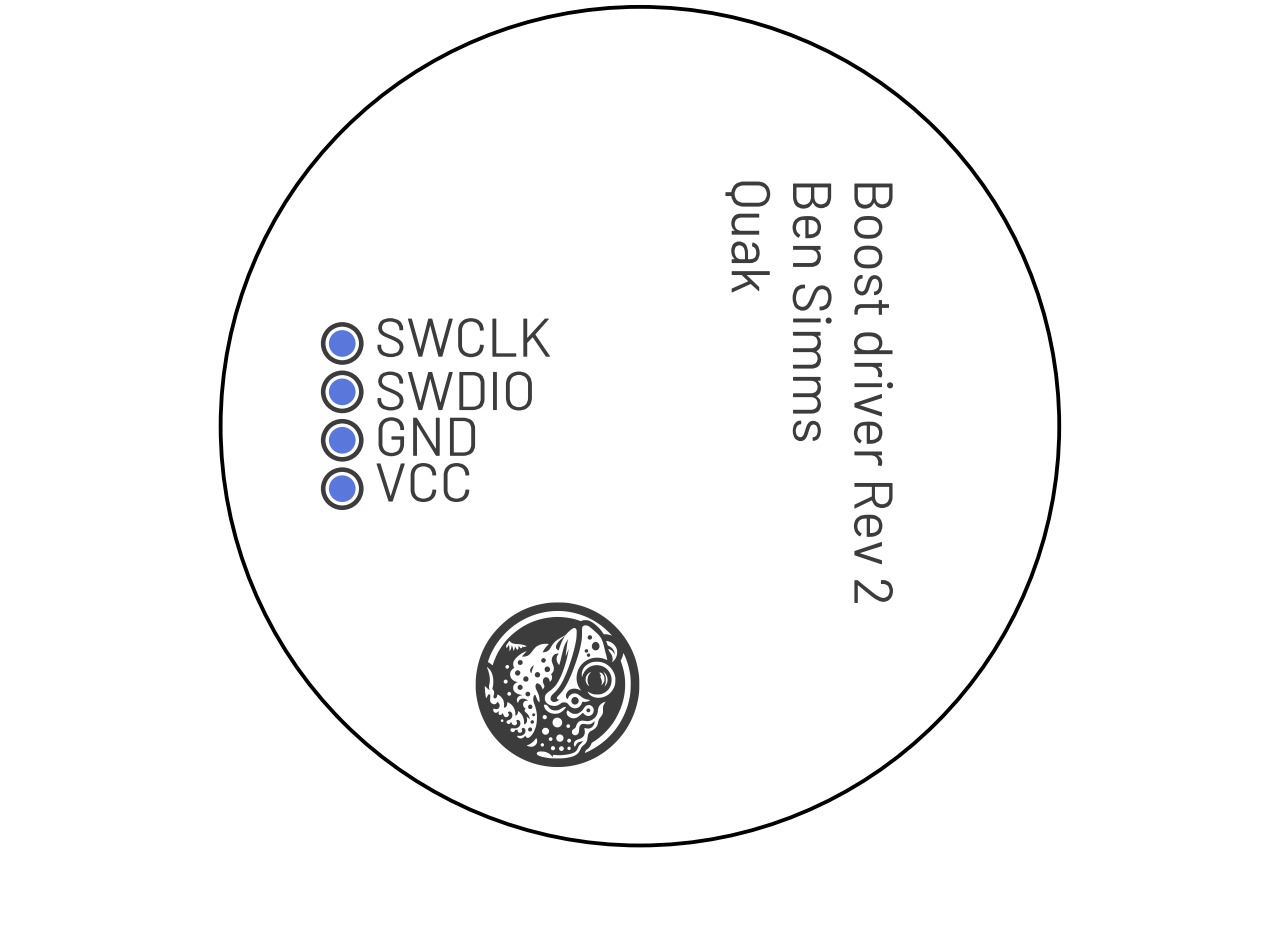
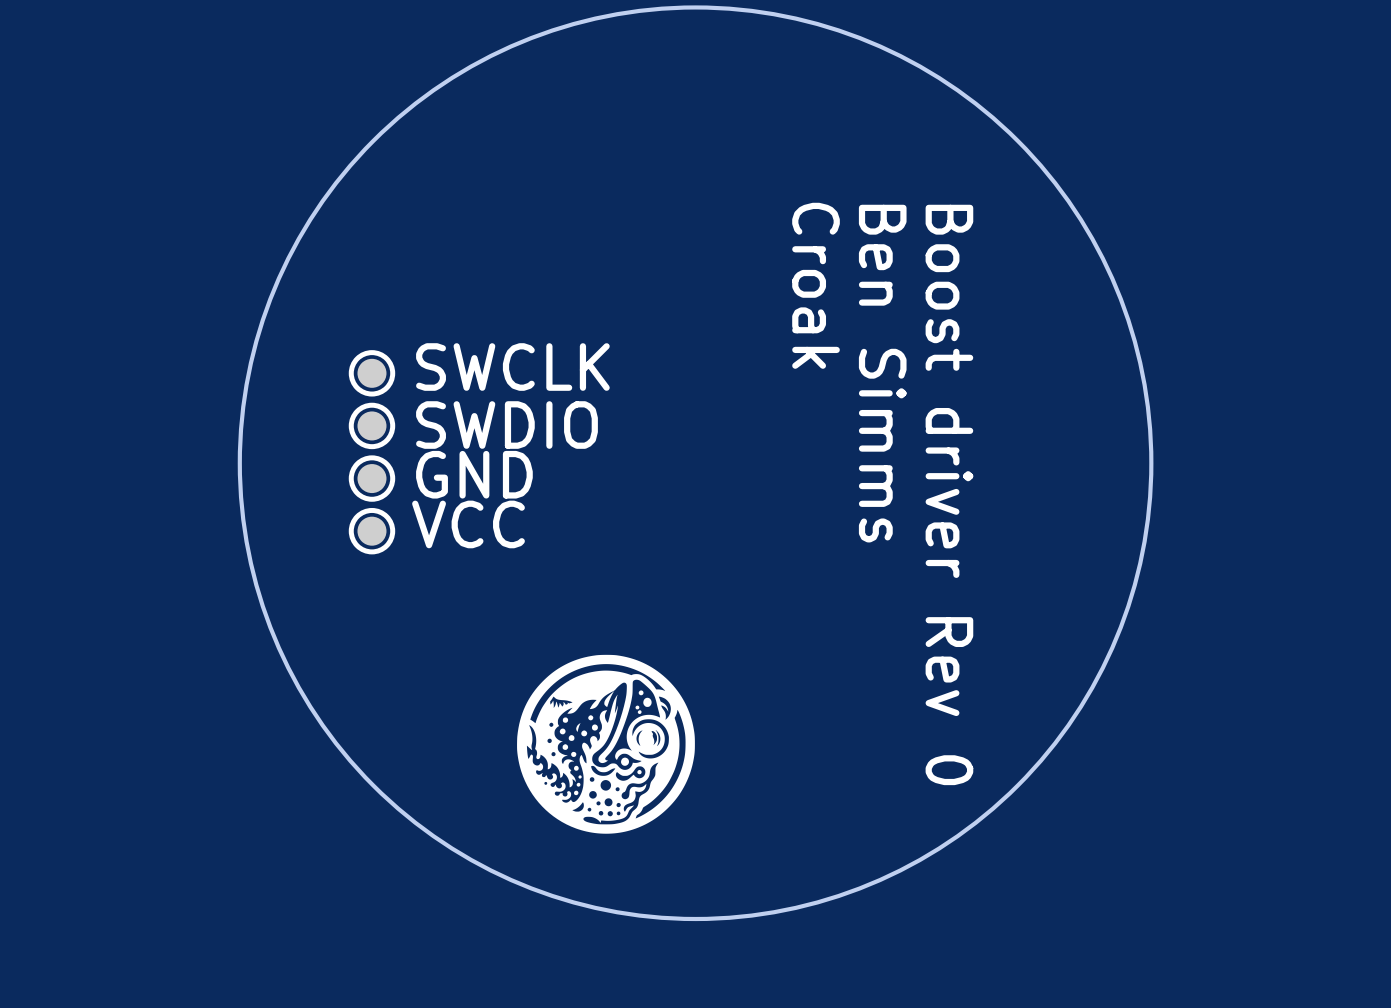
text: Quak (747, 236) -> Croak (816, 285)
text: Boost driver Rev 2 (873, 393) -> Boost driver Rev 0 (949, 494)

